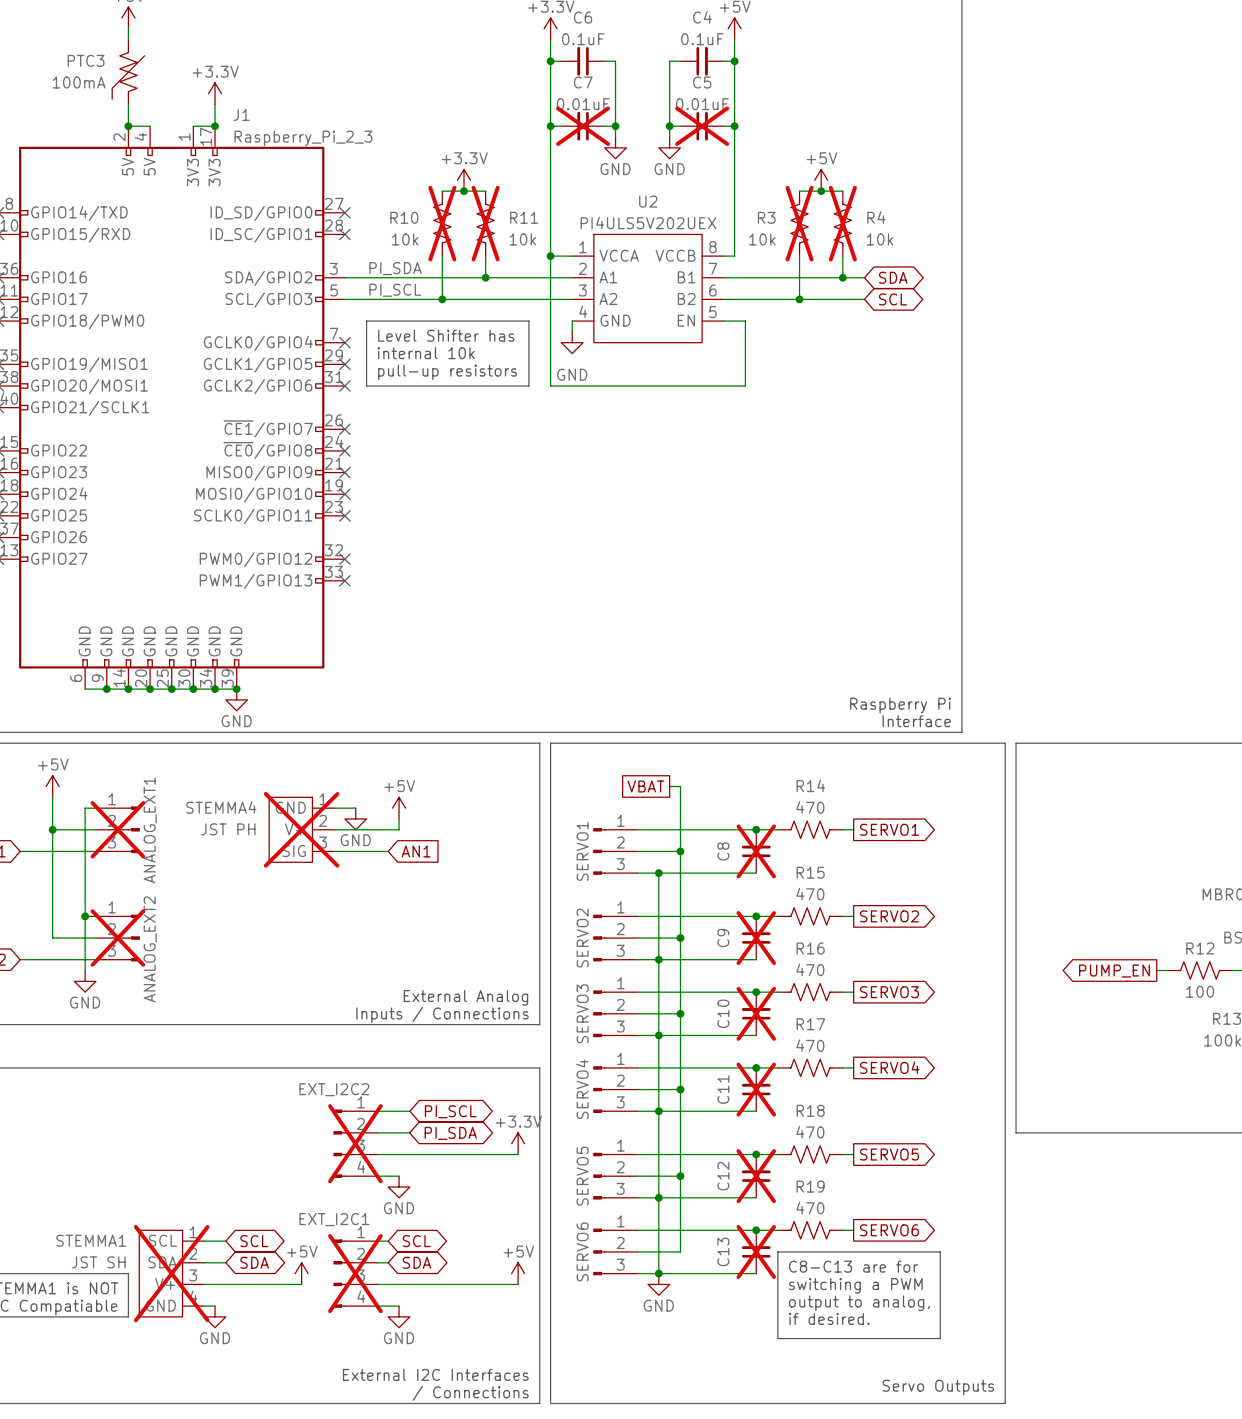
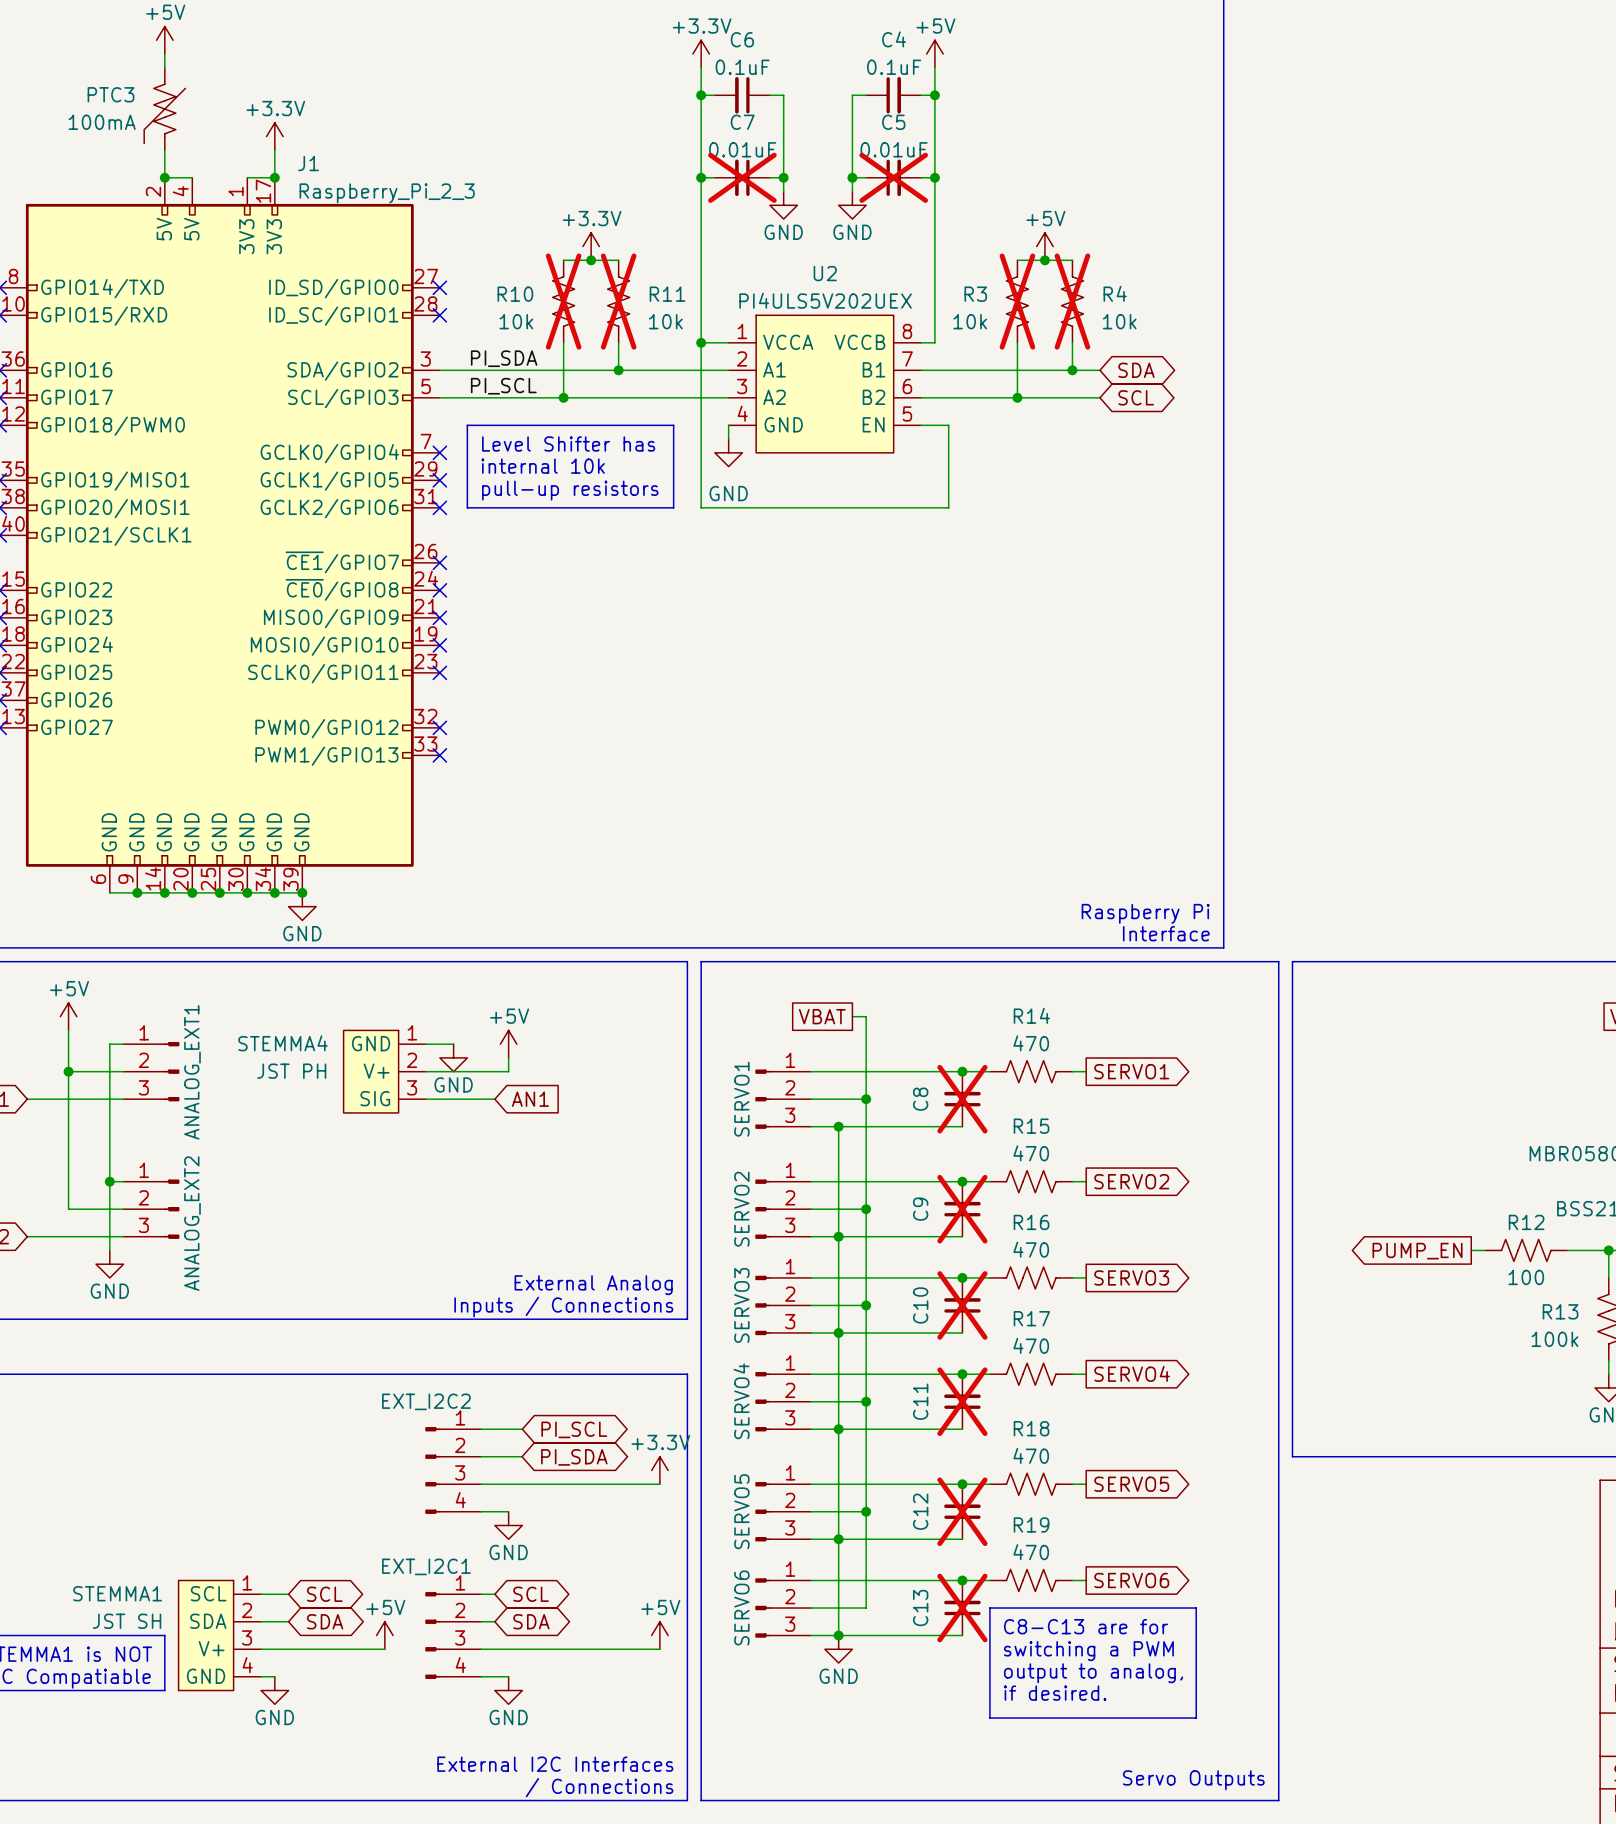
ANALOG_EXT1 do-not-place cross: (117, 829) -> none
STEMMA4 do-not-place cross: (301, 829) -> none
ANALOG_EXT2 do-not-place cross: (117, 938) -> none
EXT_I2C2 do-not-place cross: (355, 1143) -> none
STEMMA1 do-not-place cross: (171, 1273) -> none
EXT_I2C1 do-not-place cross: (355, 1273) -> none

